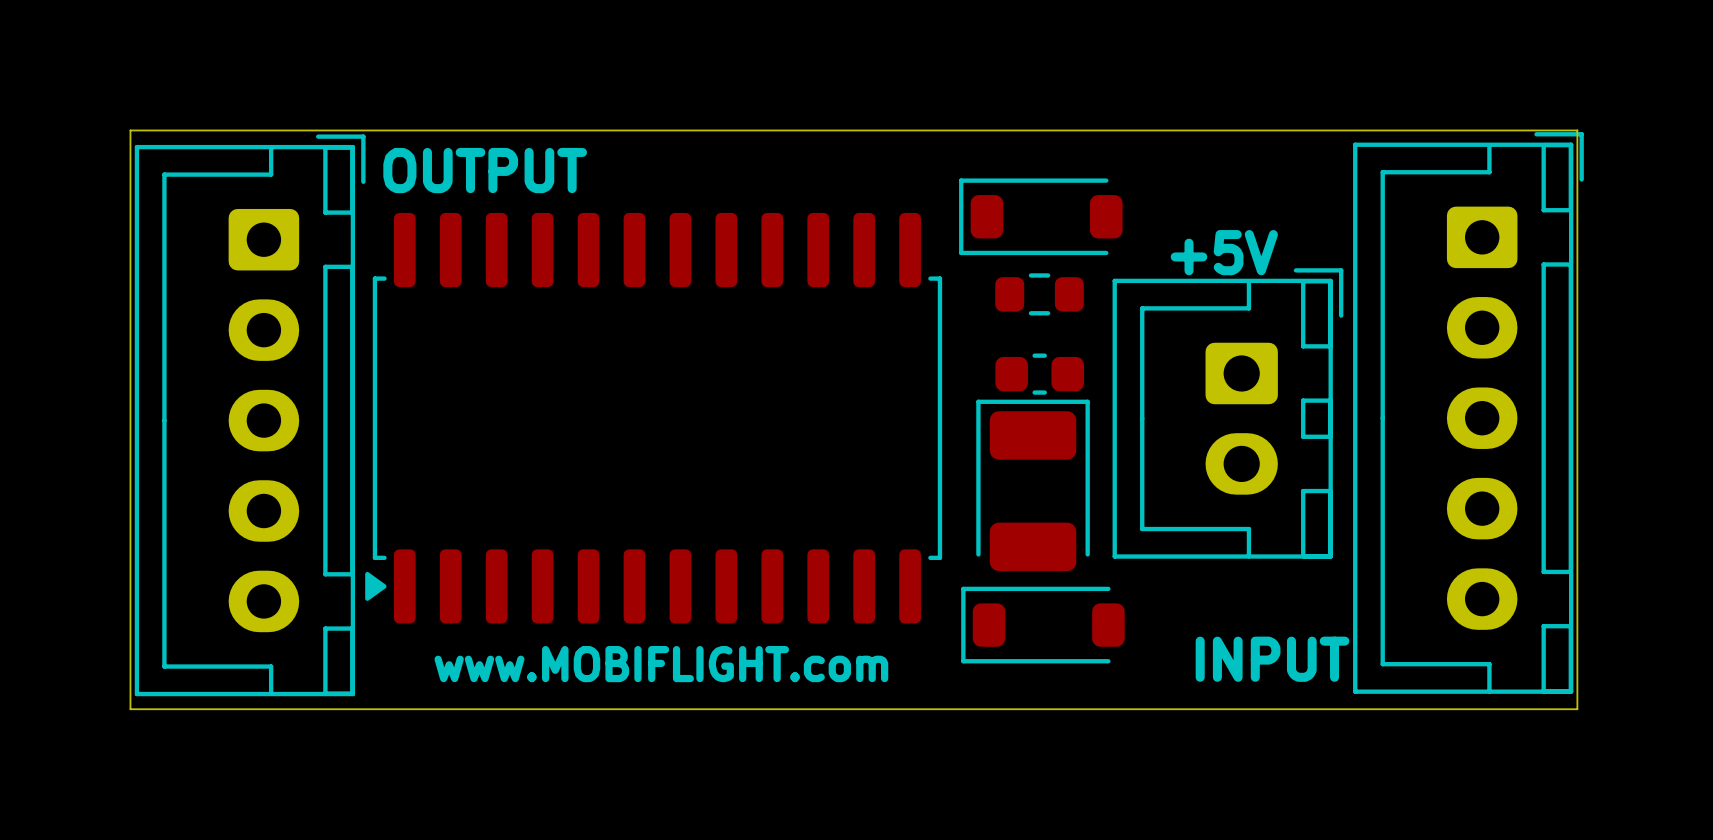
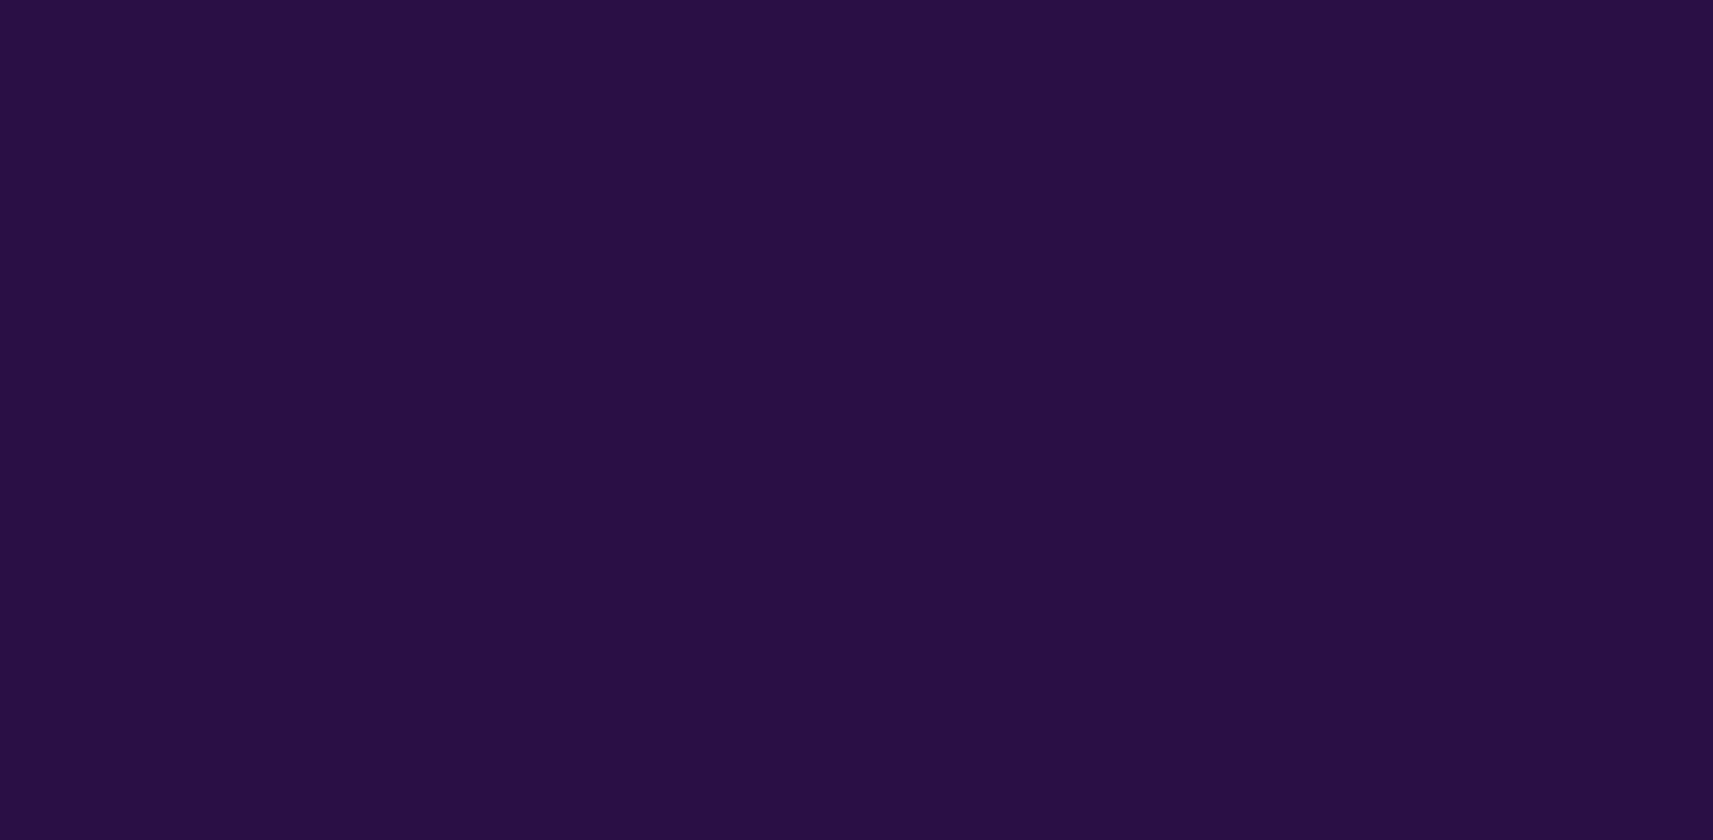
board edge: (130, 130) (1577, 130) (1577, 709) (130, 709) (130, 130) -> none
text: OUTPUT (485, 170) -> none
part: (1040, 216) -> none
text: +5V (1224, 252) -> none
part: (1039, 294) -> none
part: (1039, 374) -> none
part: (1468, 412) -> none
part: (1227, 413) -> none
part: (250, 415) -> none
part: (653, 418) -> none
part: (1033, 485) -> none
part: (1042, 625) -> none
text: INPUT (1272, 659) -> none
text: www.MOBIFLIGHT.com (661, 664) -> none

